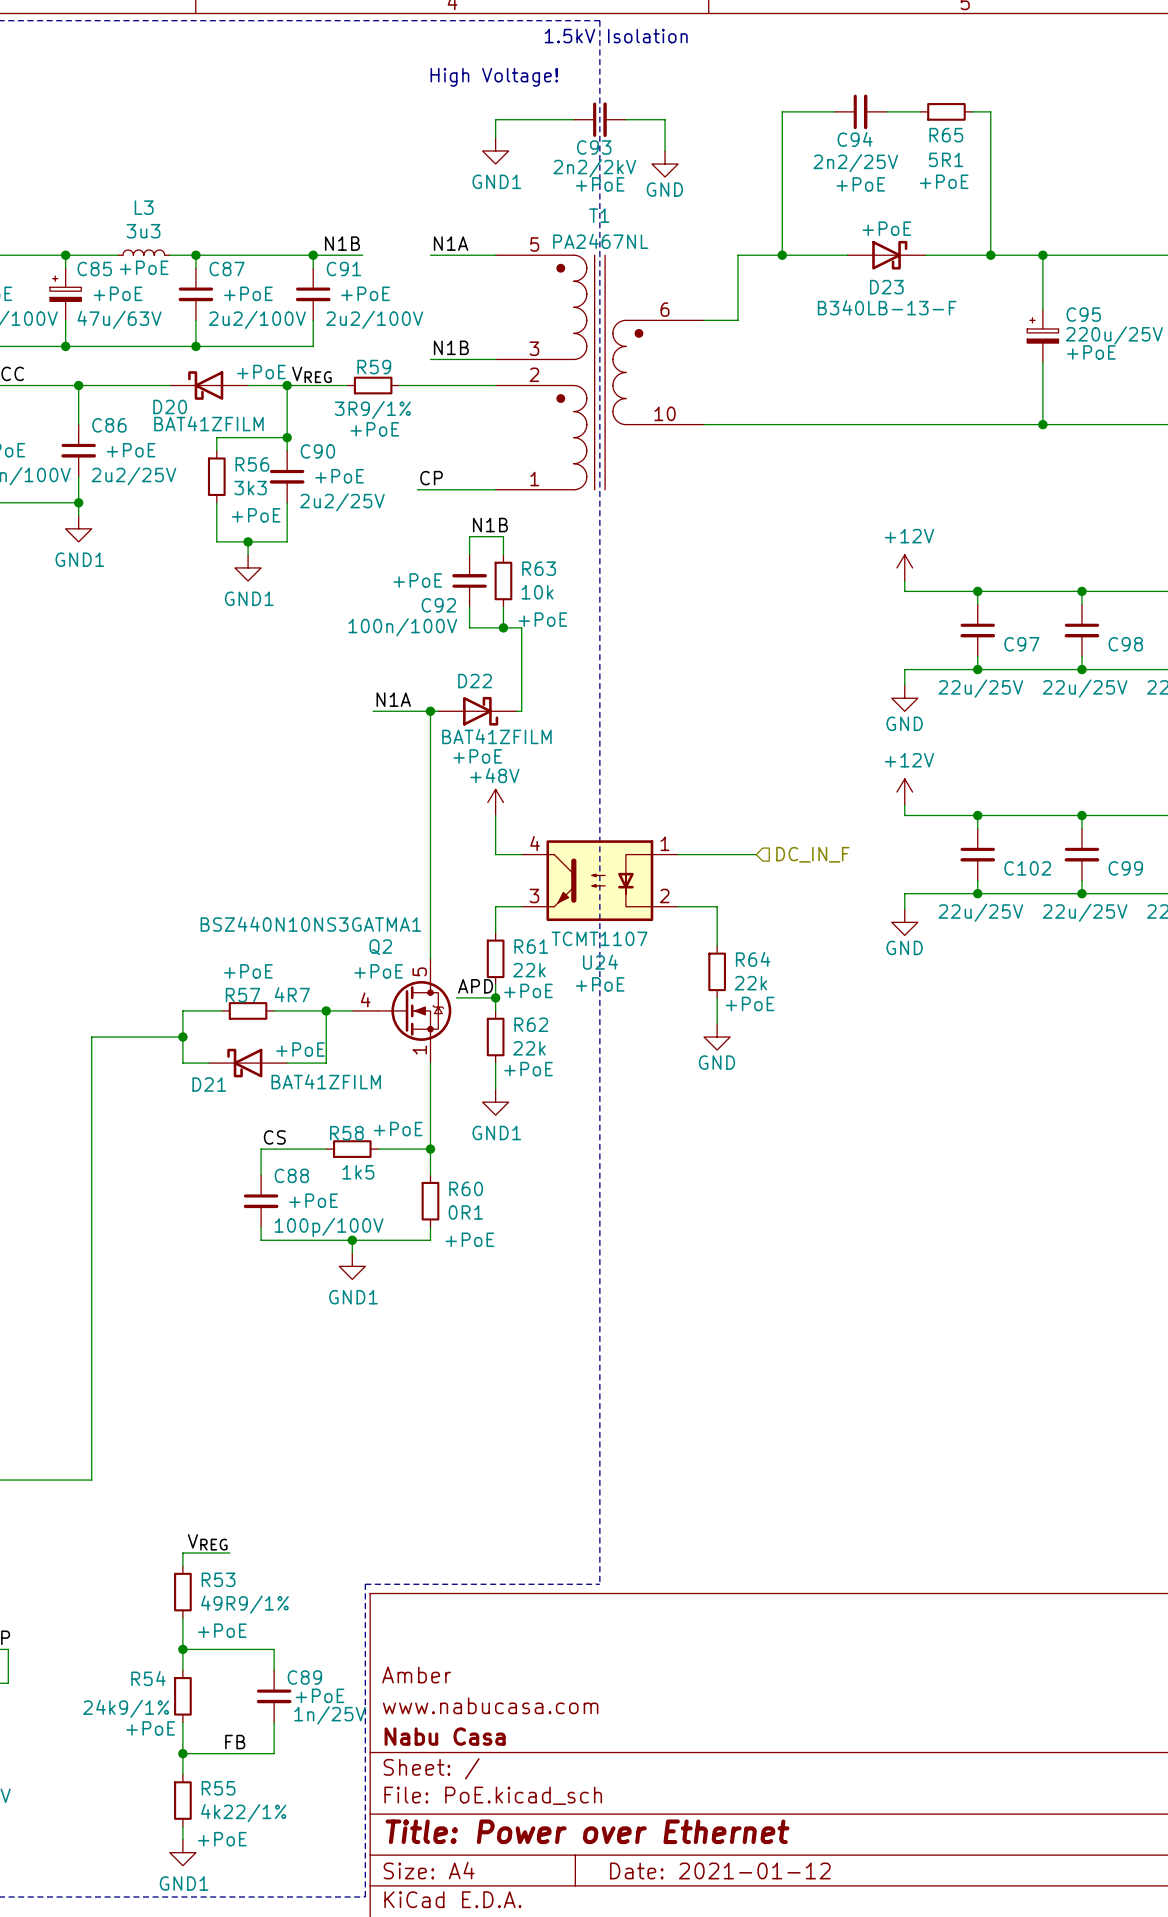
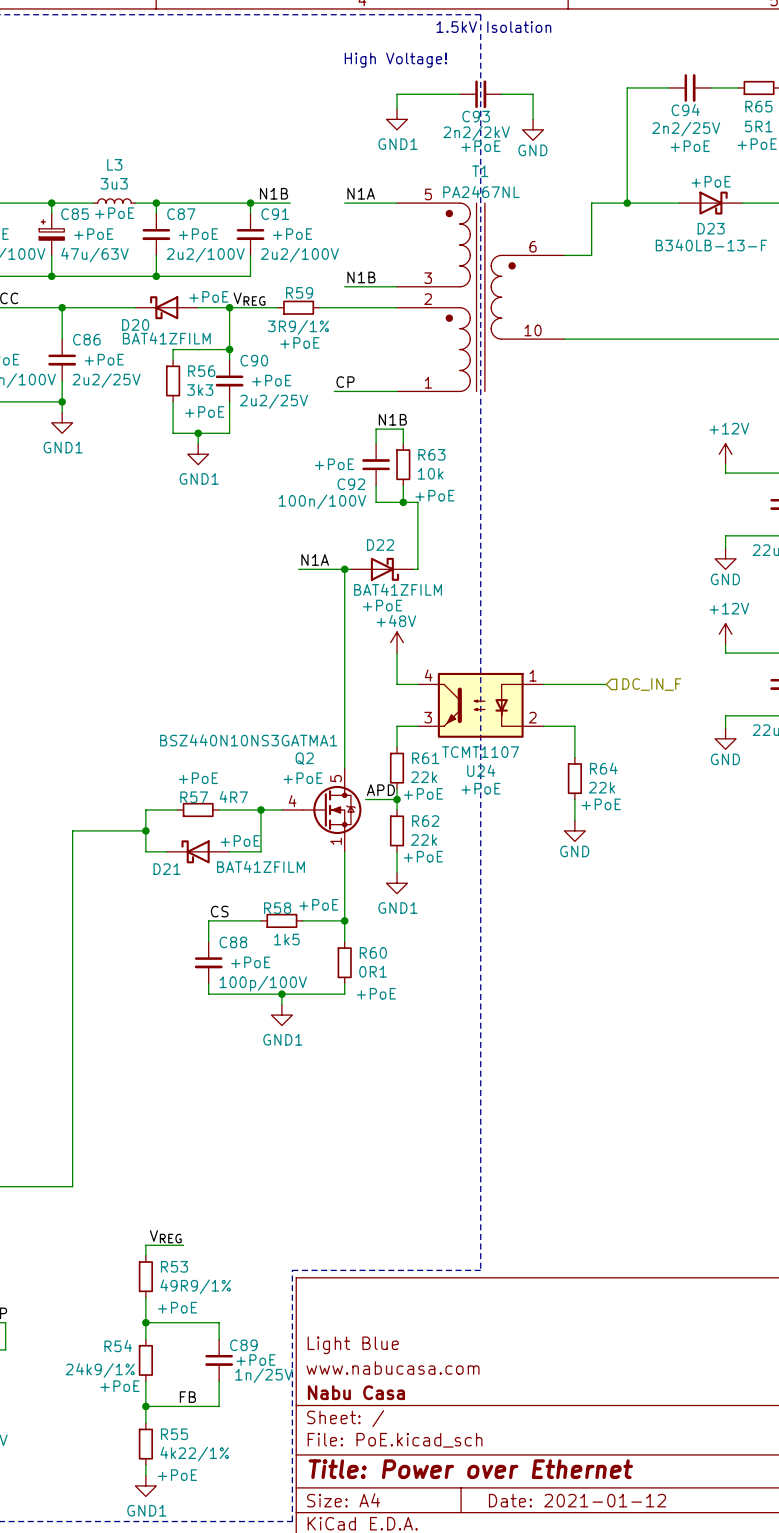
title block: Amber (416, 1675) -> Light Blue (353, 1345)

